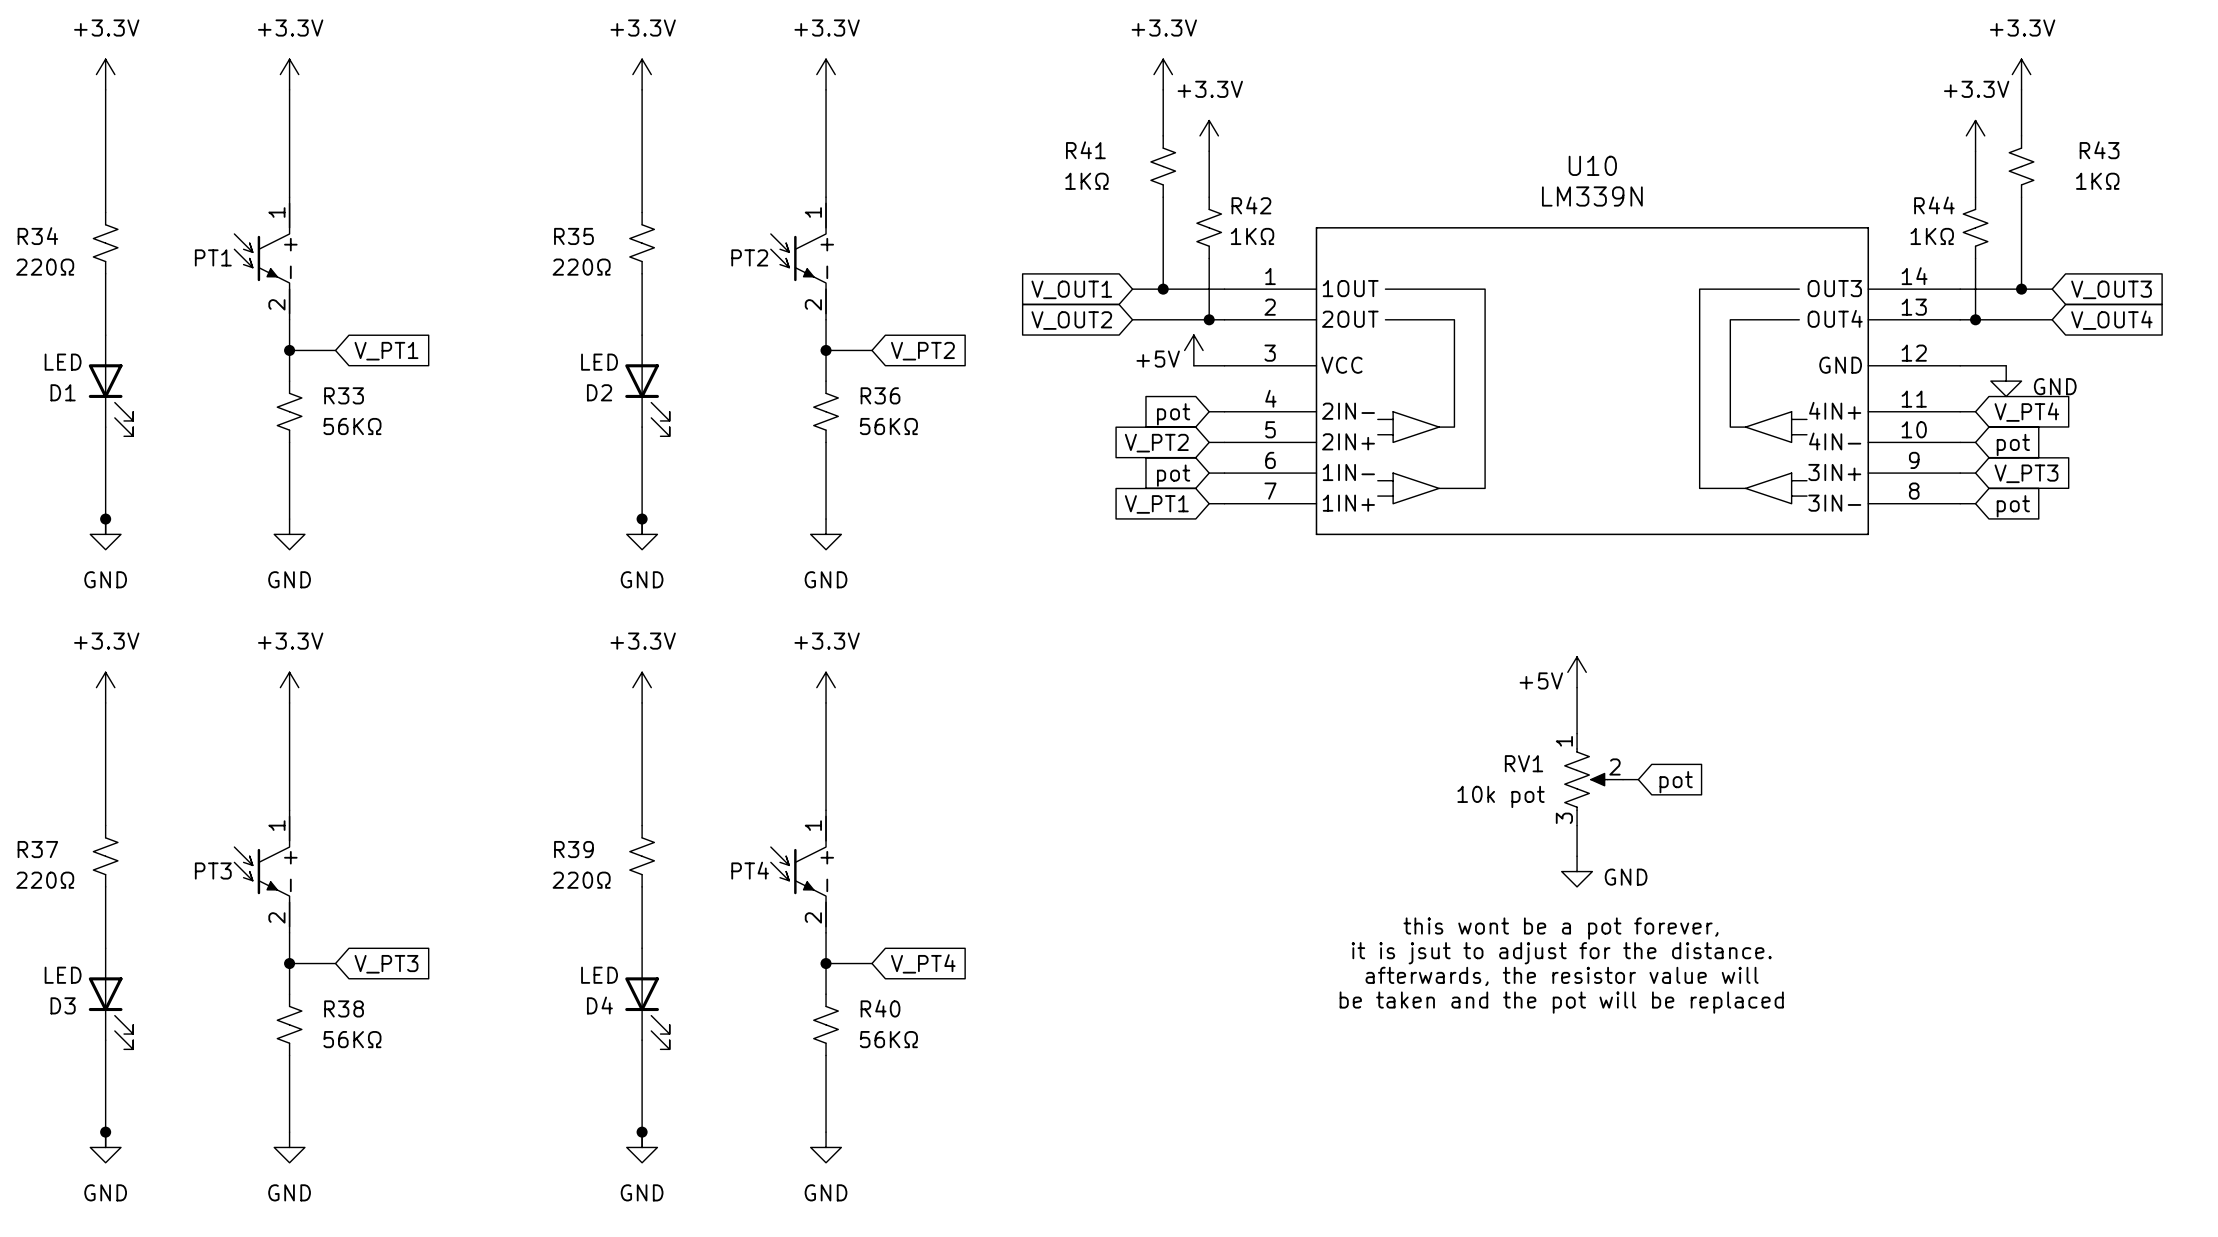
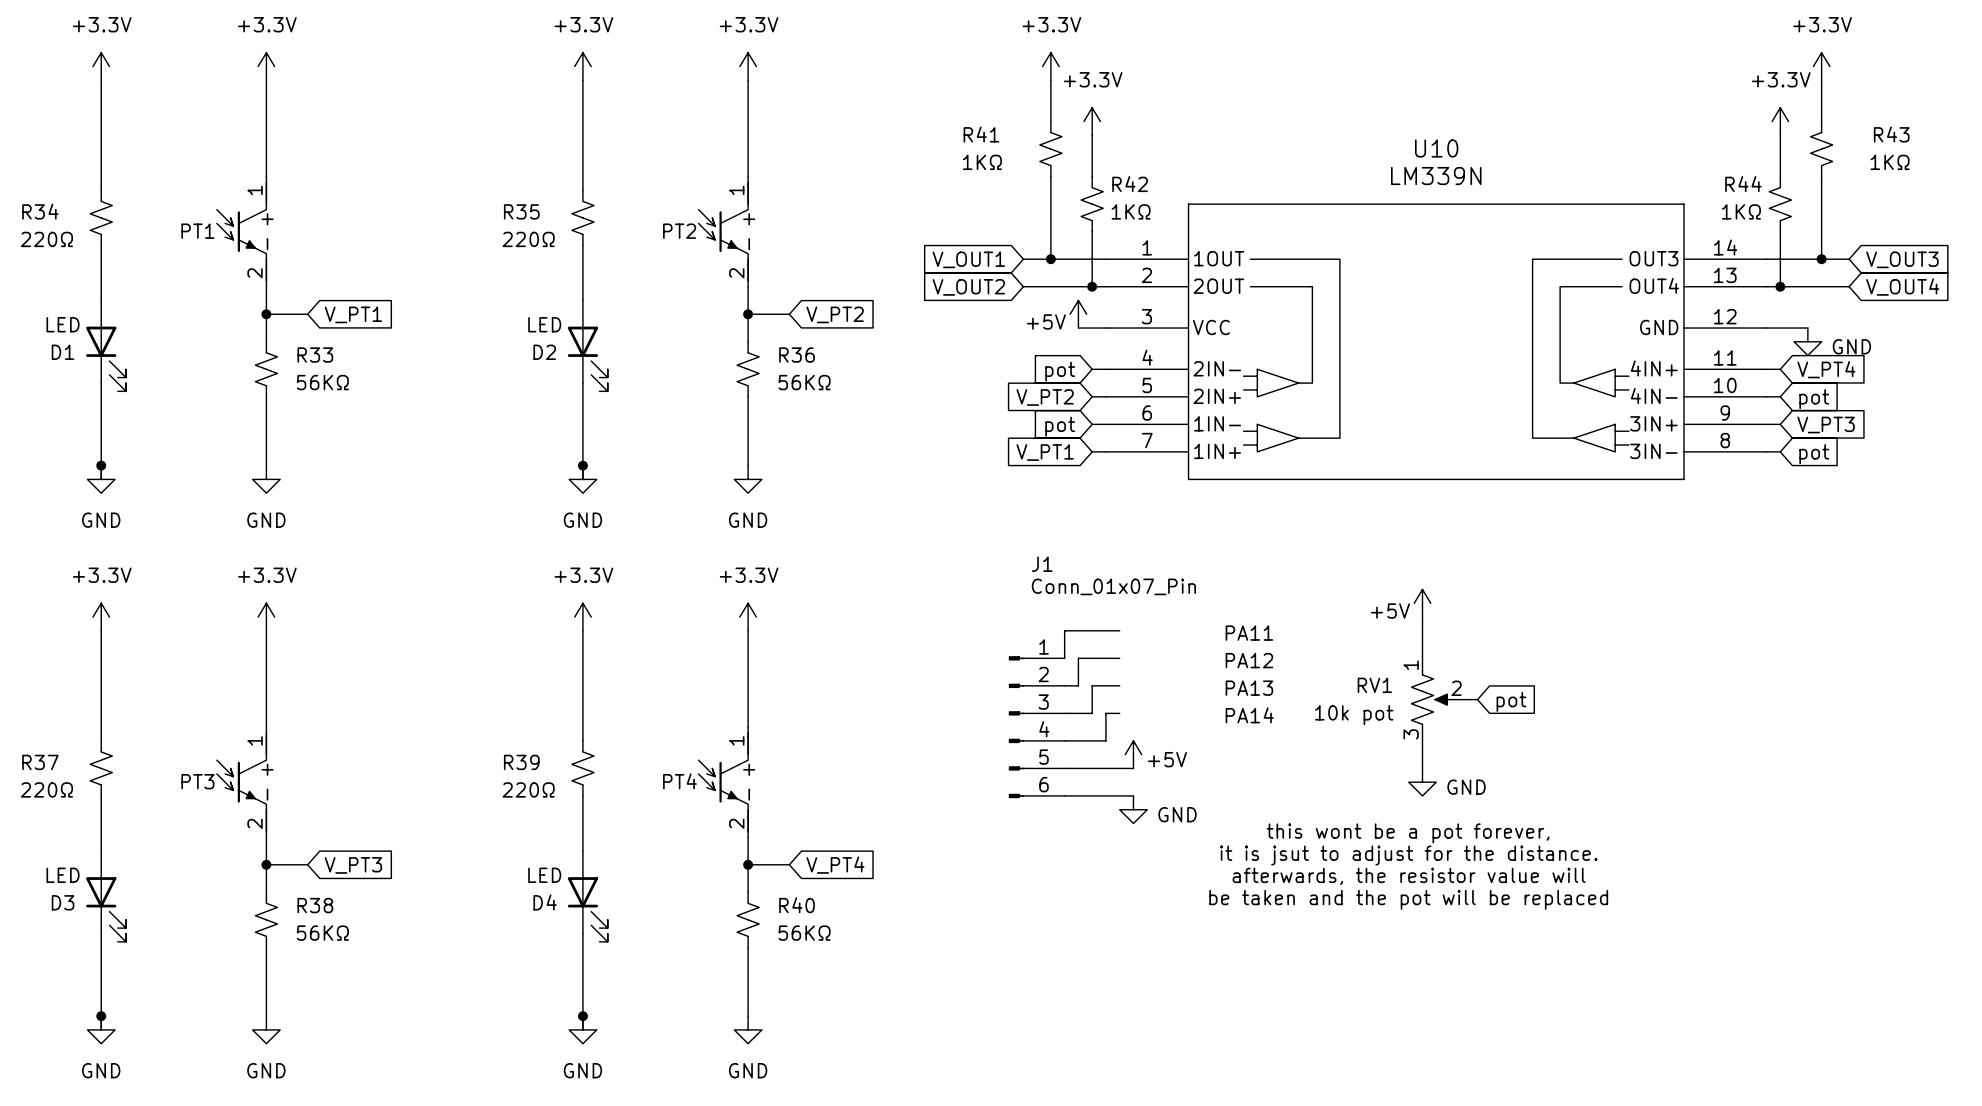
wire: none -> (1119, 630) (1064, 630) (1064, 658)
text: none -> PA11 (1249, 633)
wire: none -> (1119, 658) (1078, 658) (1078, 685) (1064, 685)
text: none -> PA12 (1249, 660)
wire: none -> (1119, 685) (1092, 685) (1092, 713) (1064, 713)
text: none -> PA13 (1249, 688)
wire: none -> (1119, 713) (1105, 713) (1105, 740) (1064, 740)
text: none -> PA14 (1249, 715)
J1: none -> Conn_01x07_Pin (1036, 727)
power symbol: none -> +5V (1133, 754)
wire: none -> (1064, 768) (1133, 768)
wire: none -> (1064, 795) (1133, 795)
power symbol: none -> GND (1133, 809)

